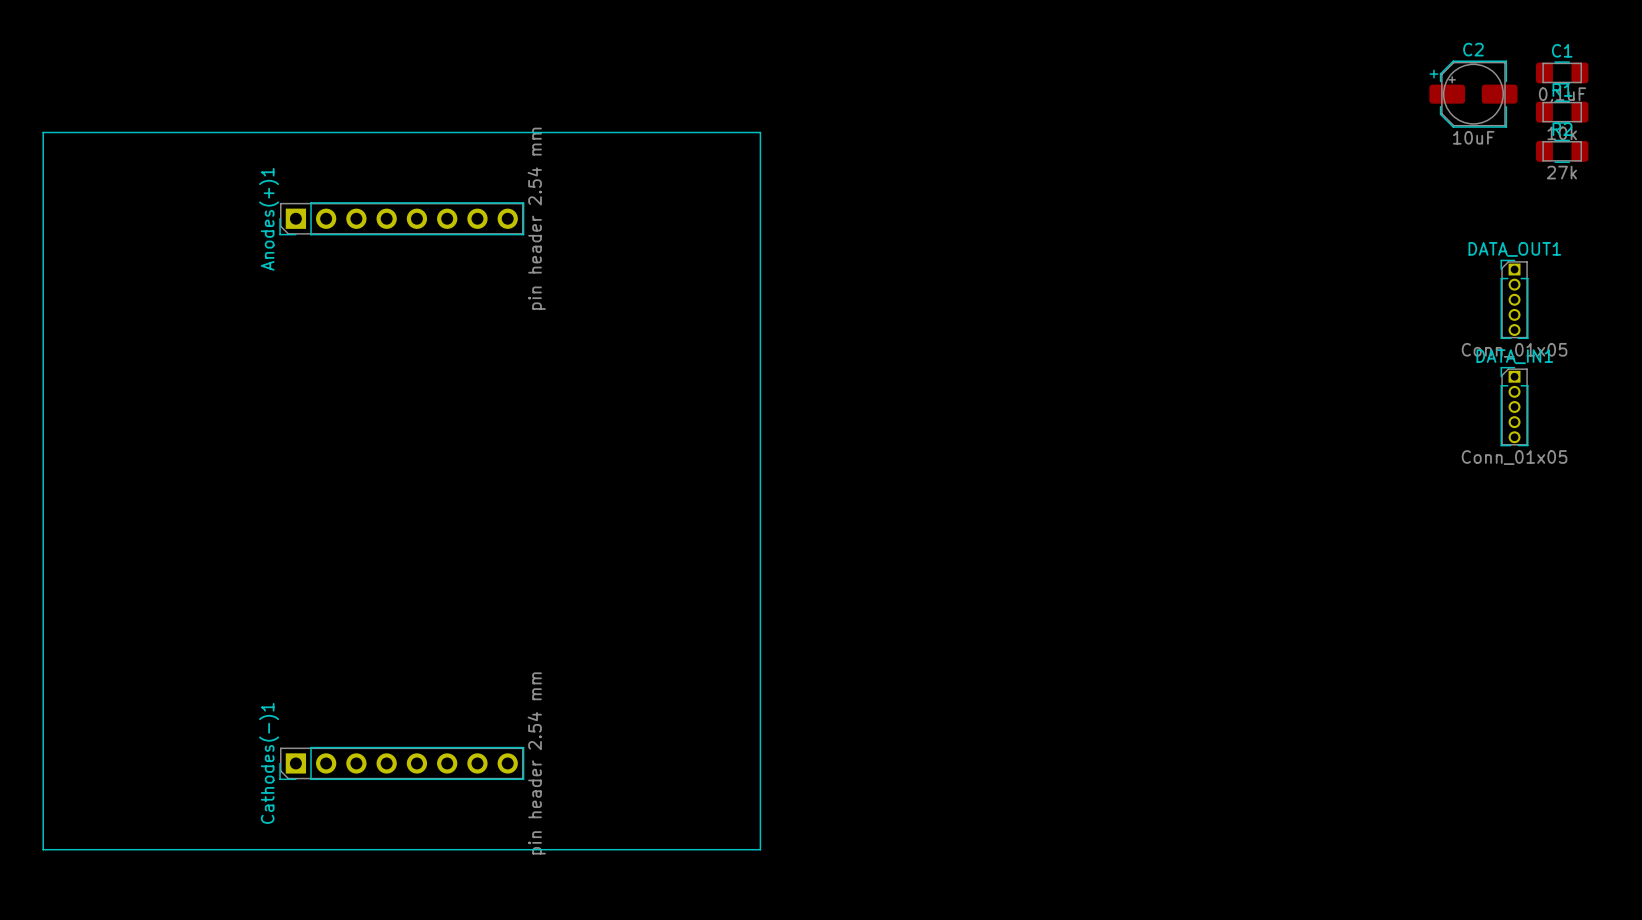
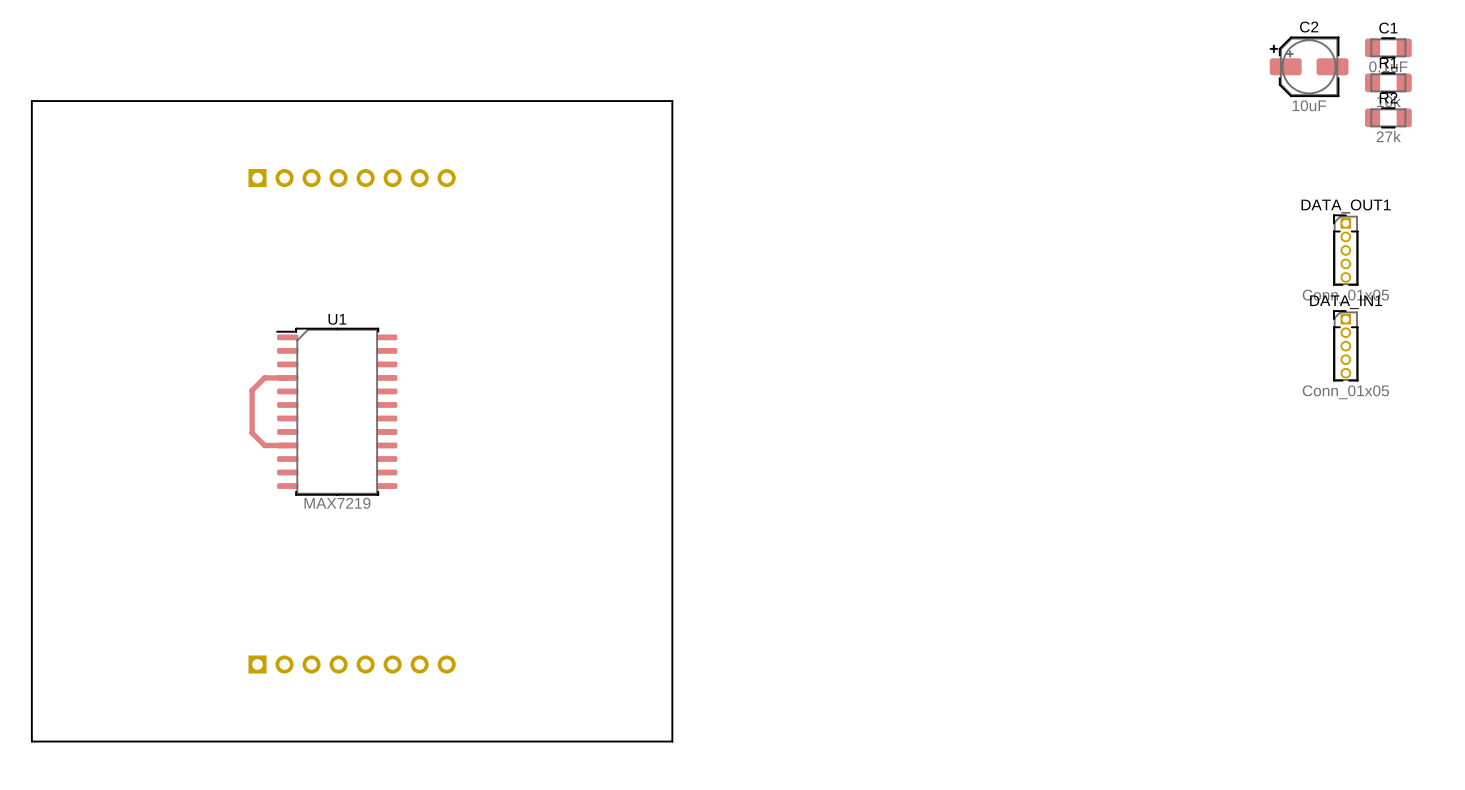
Anodes(+)1 side: top (401, 218) -> bottom (352, 178)
track: none -> (287, 377) (264, 377) (252, 390) (252, 433) (264, 445) (287, 445)
U1: none -> MAX7219 (336, 411)
Cathodes(-)1 side: top (401, 763) -> bottom (352, 664)

